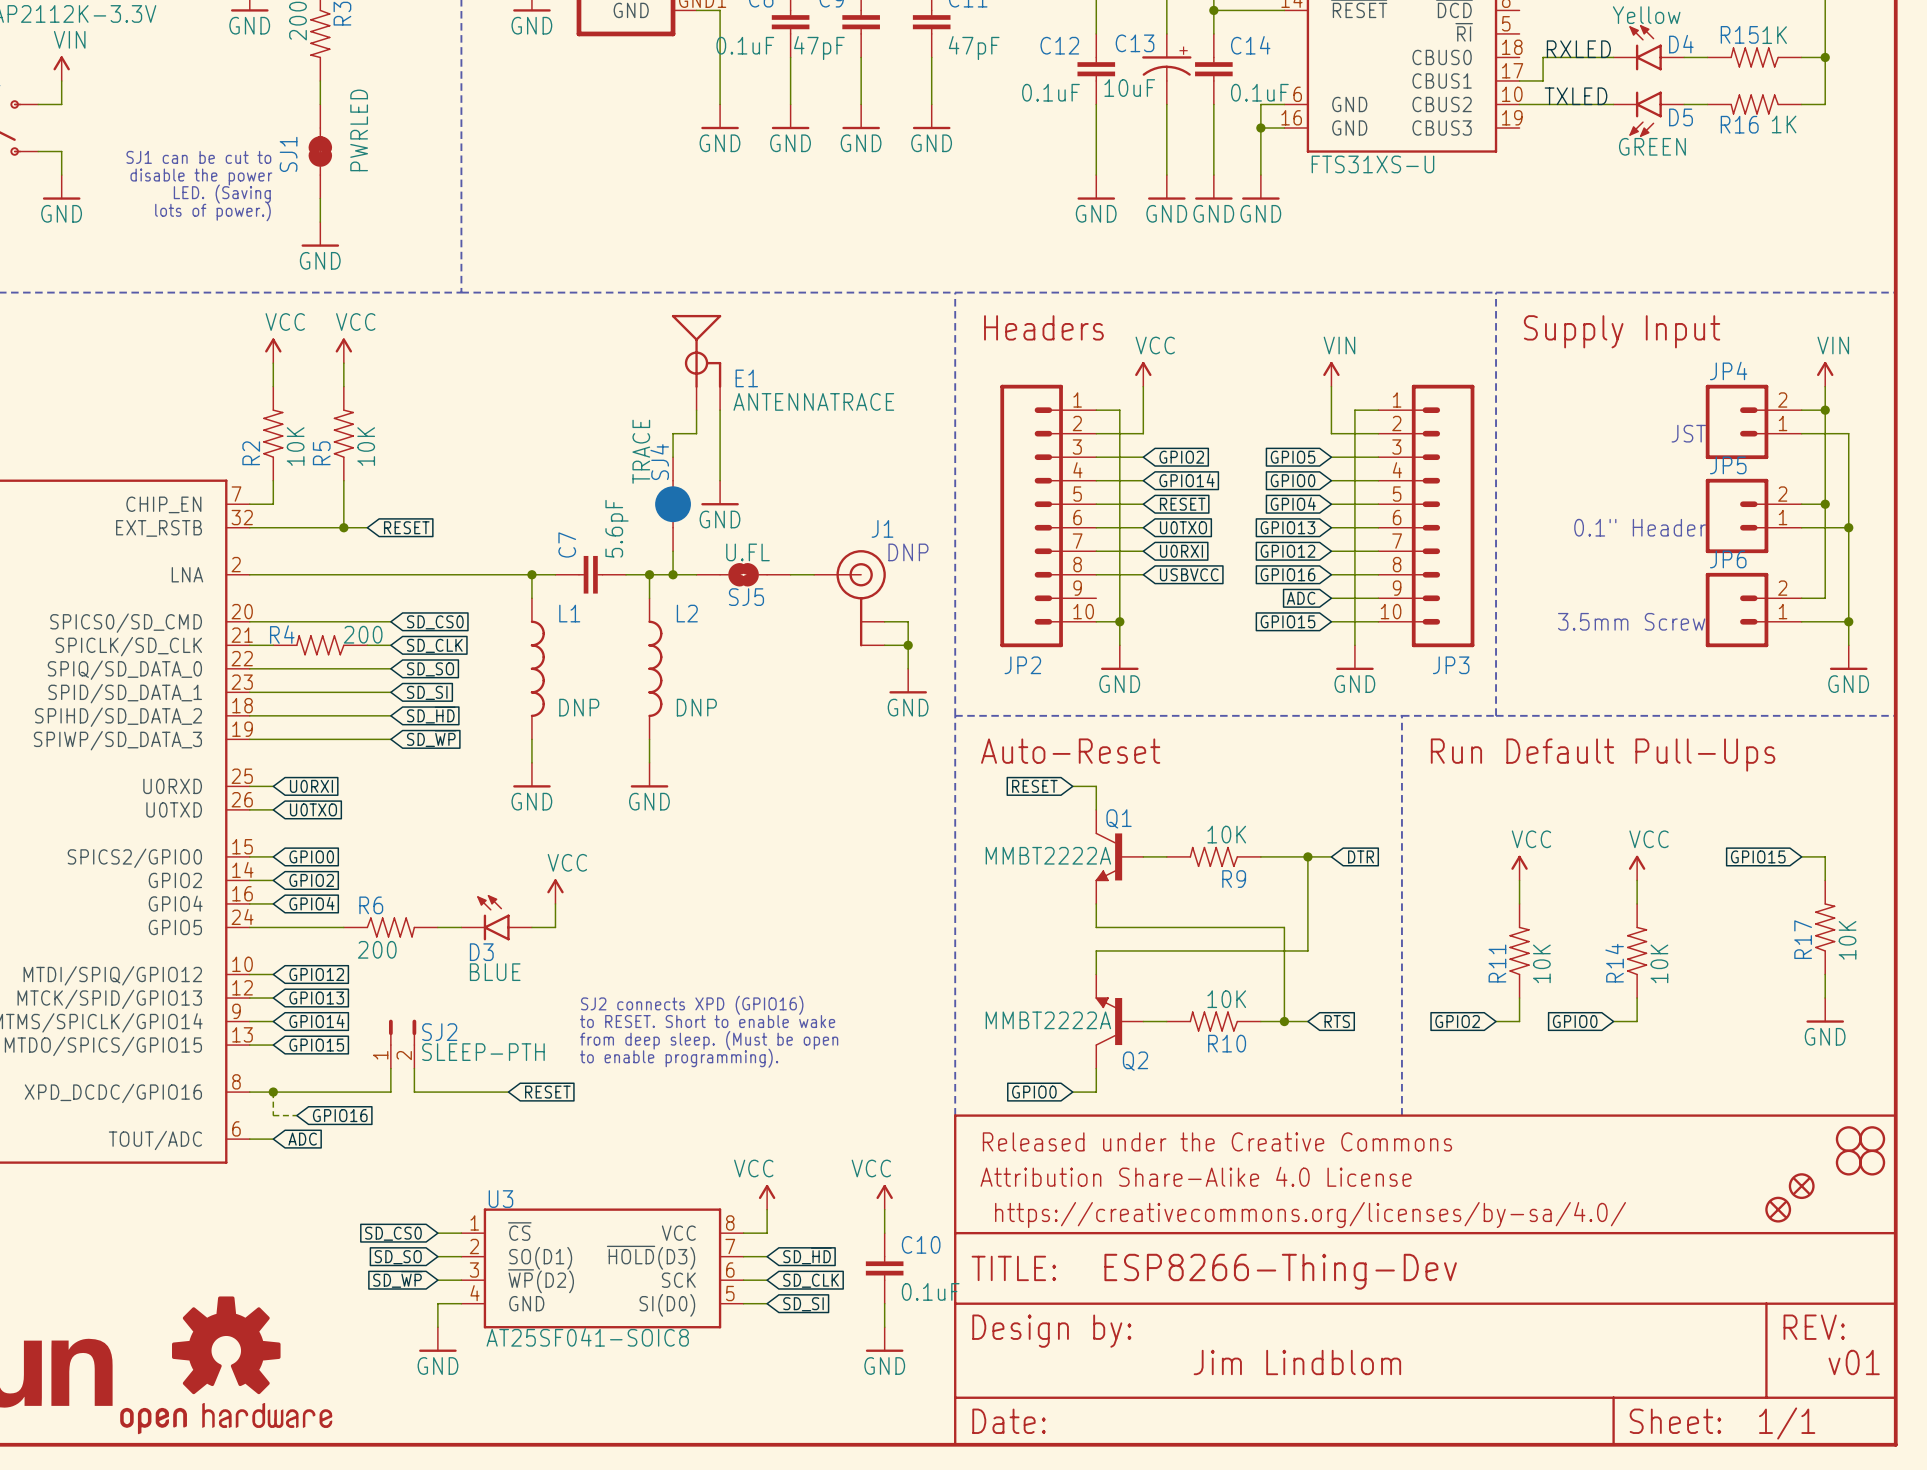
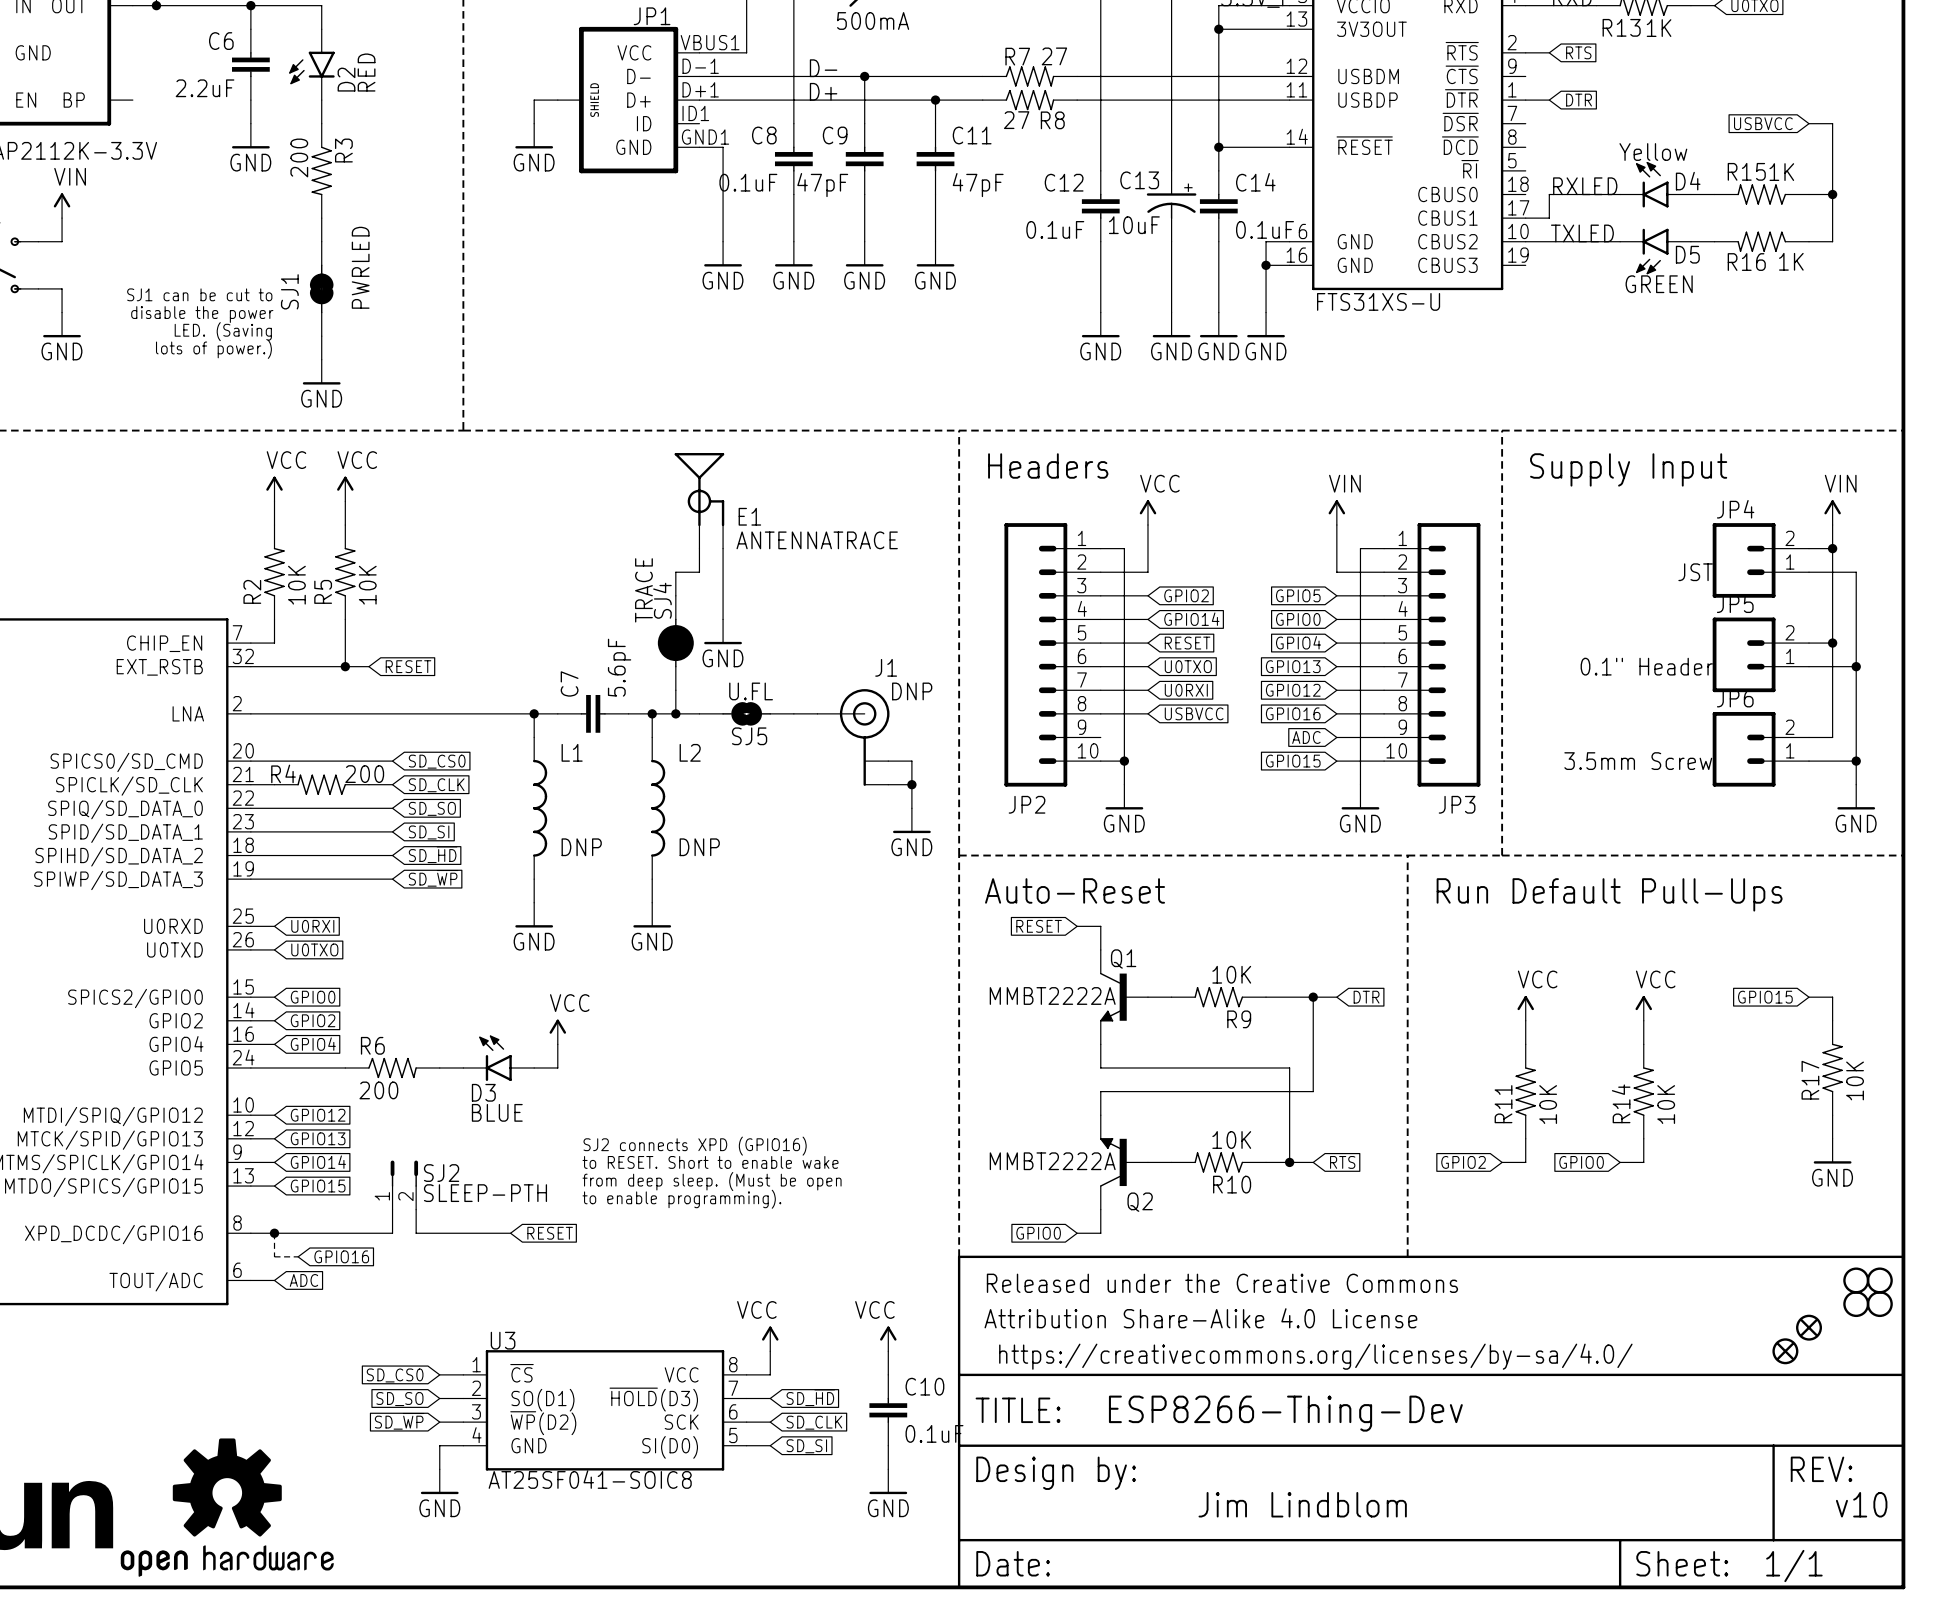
text: v01 (1854, 1362) -> v10 (1861, 1504)

